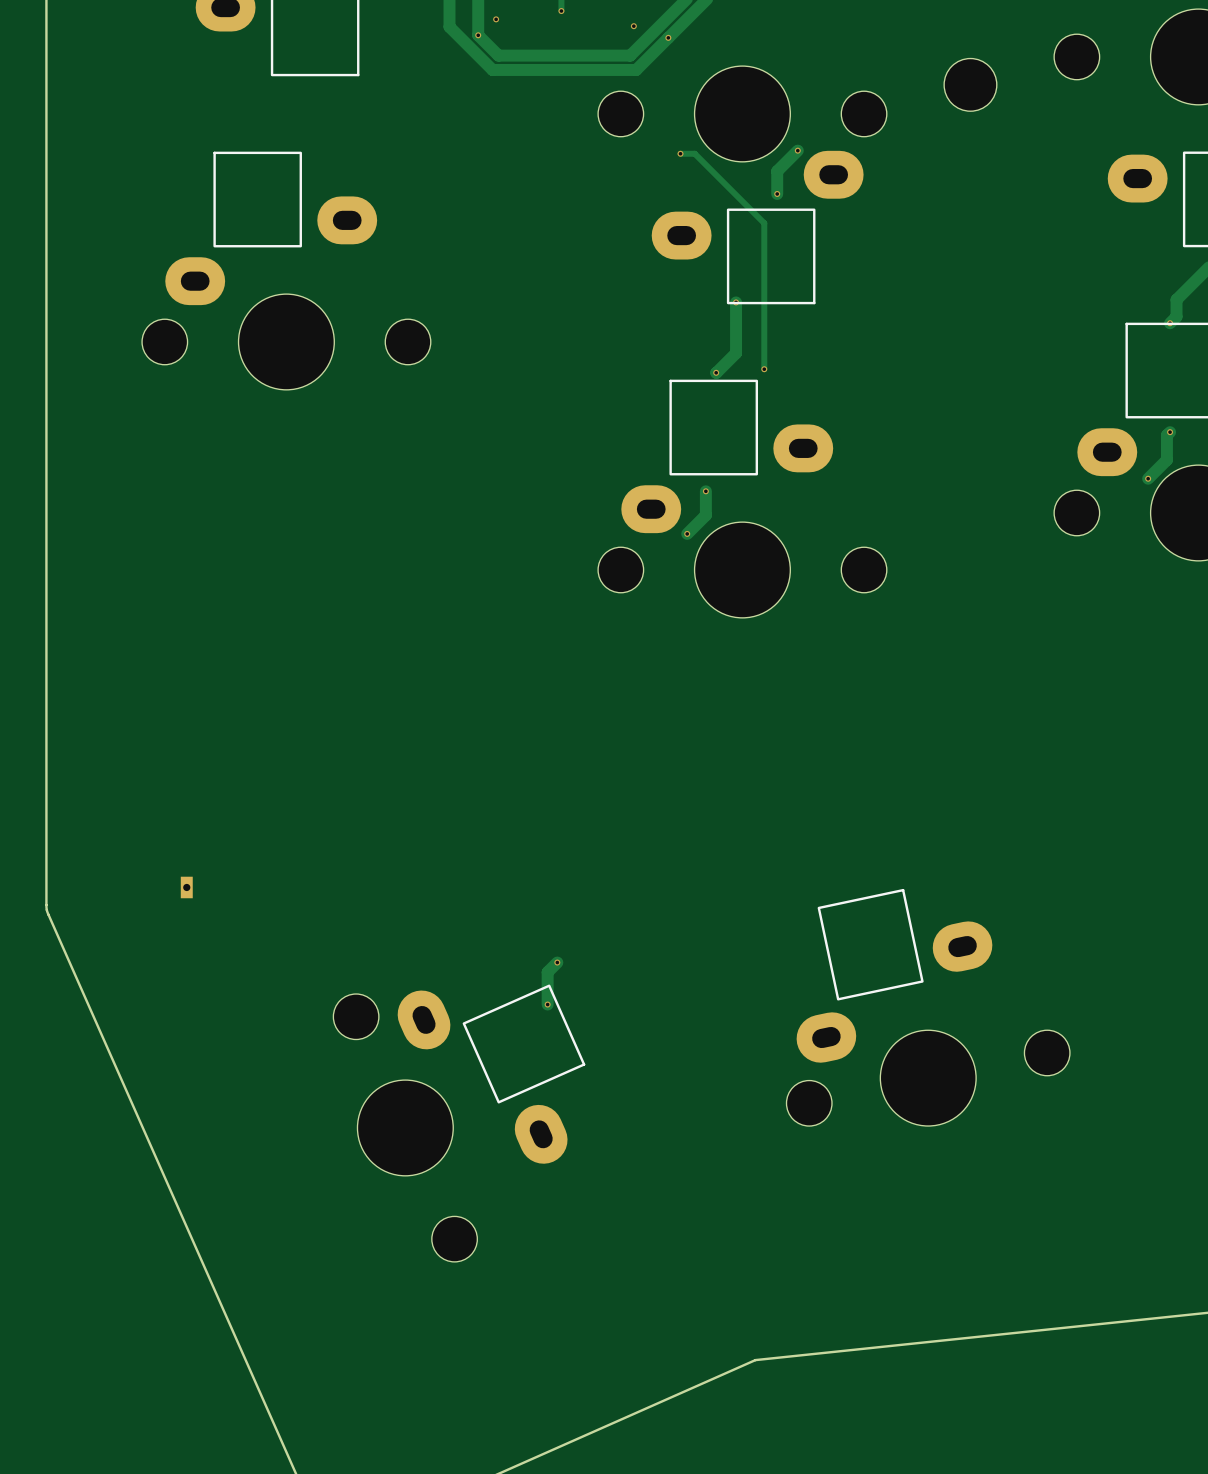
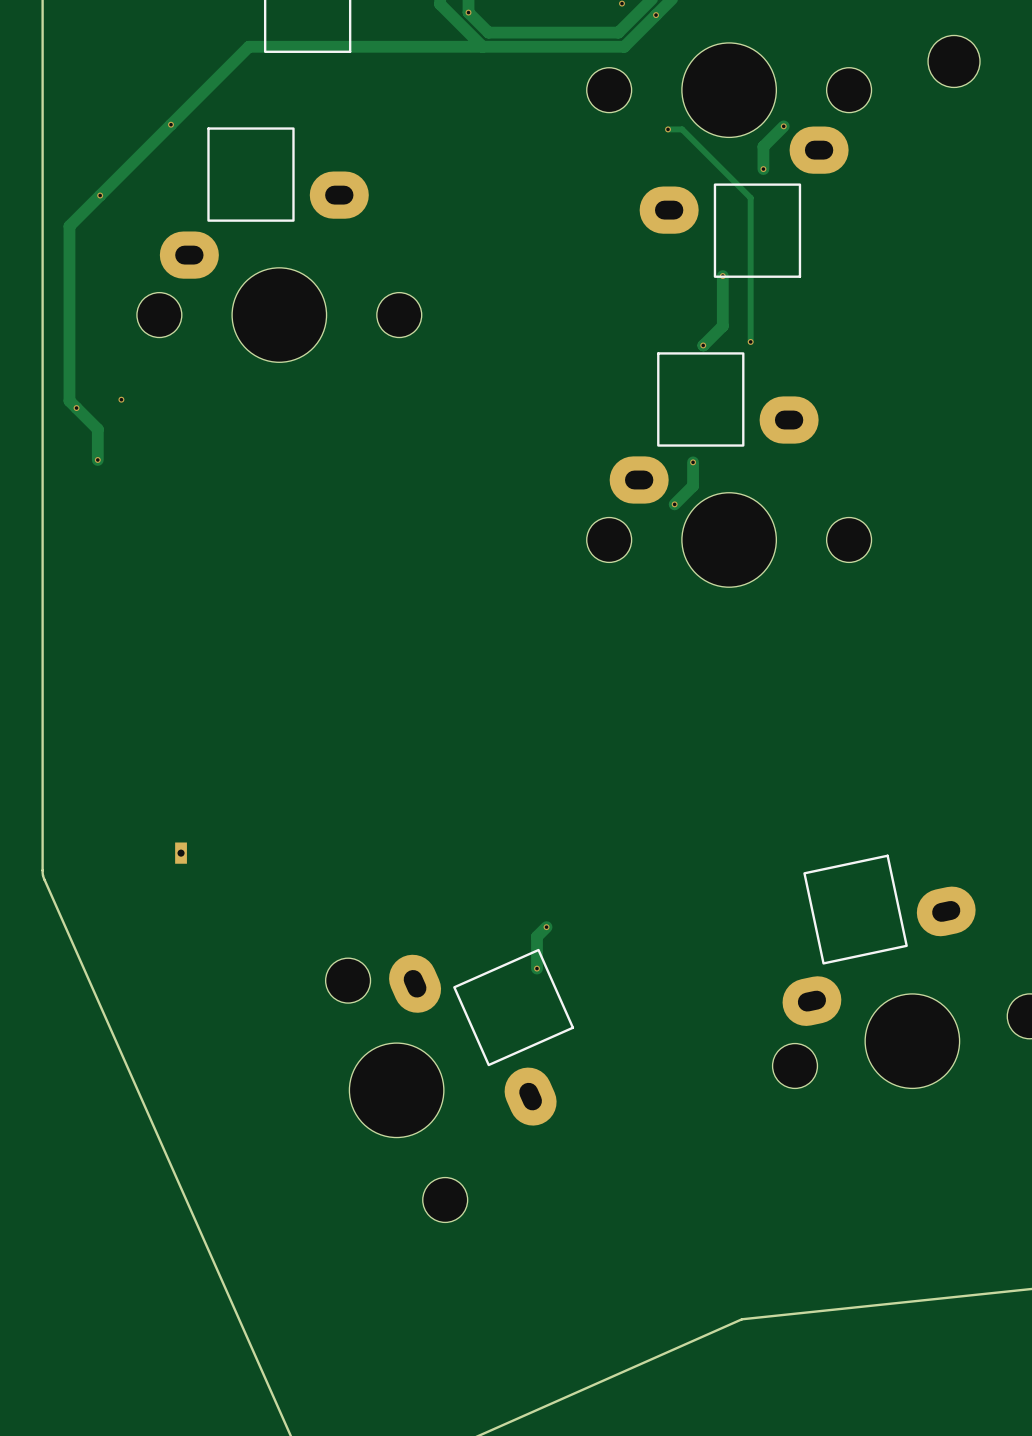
track: none -> (482, 46) (248, 46) (69, 226) (69, 400) (97, 429) (97, 459)
via: none -> (171, 124)
via: none -> (100, 195)
via: none -> (121, 399)
via: none -> (76, 408)
via: none -> (97, 459)

